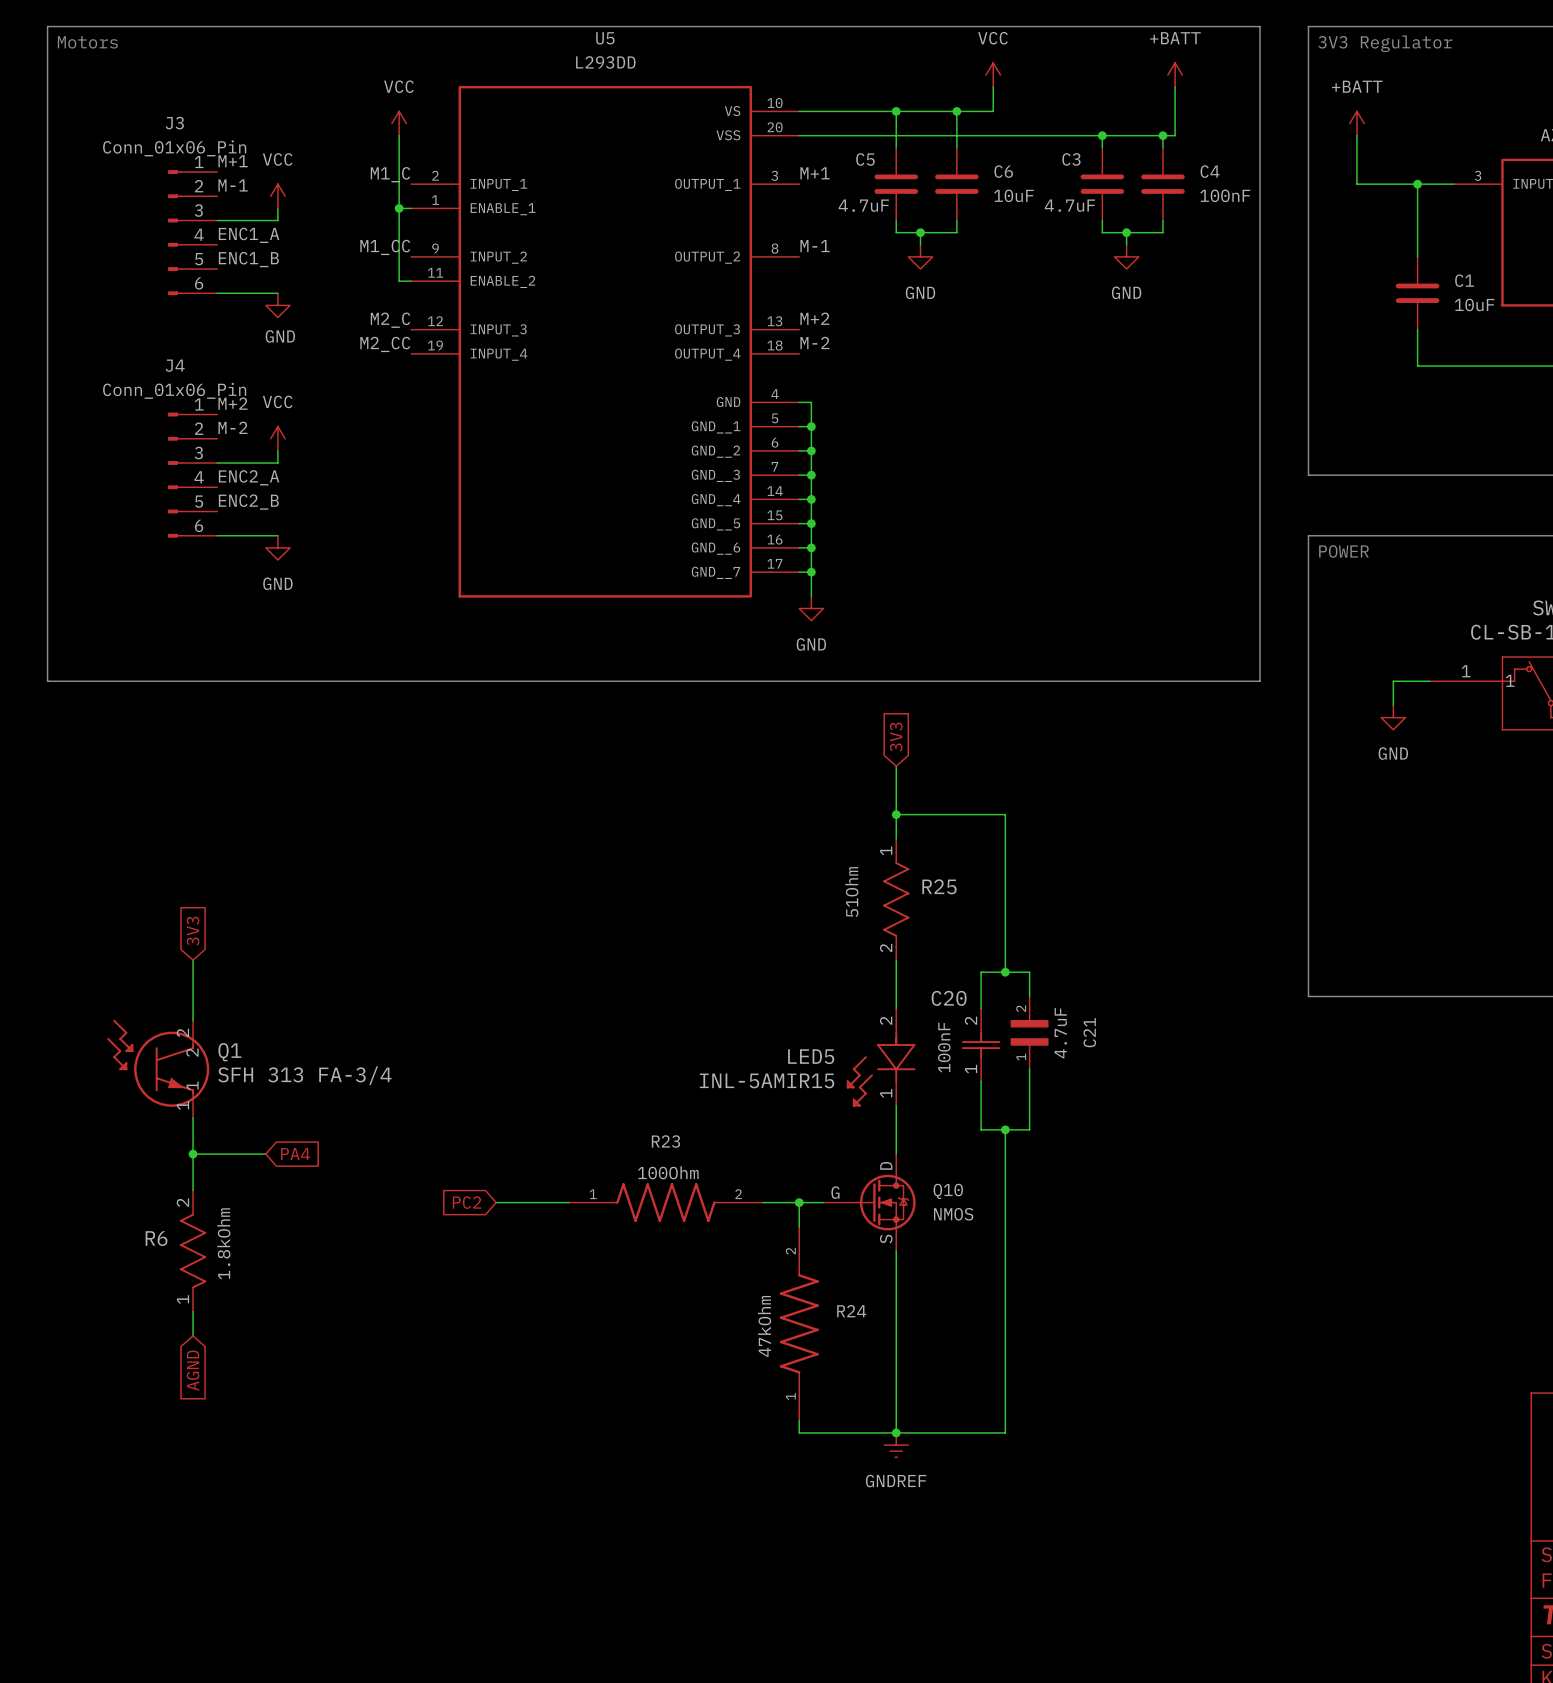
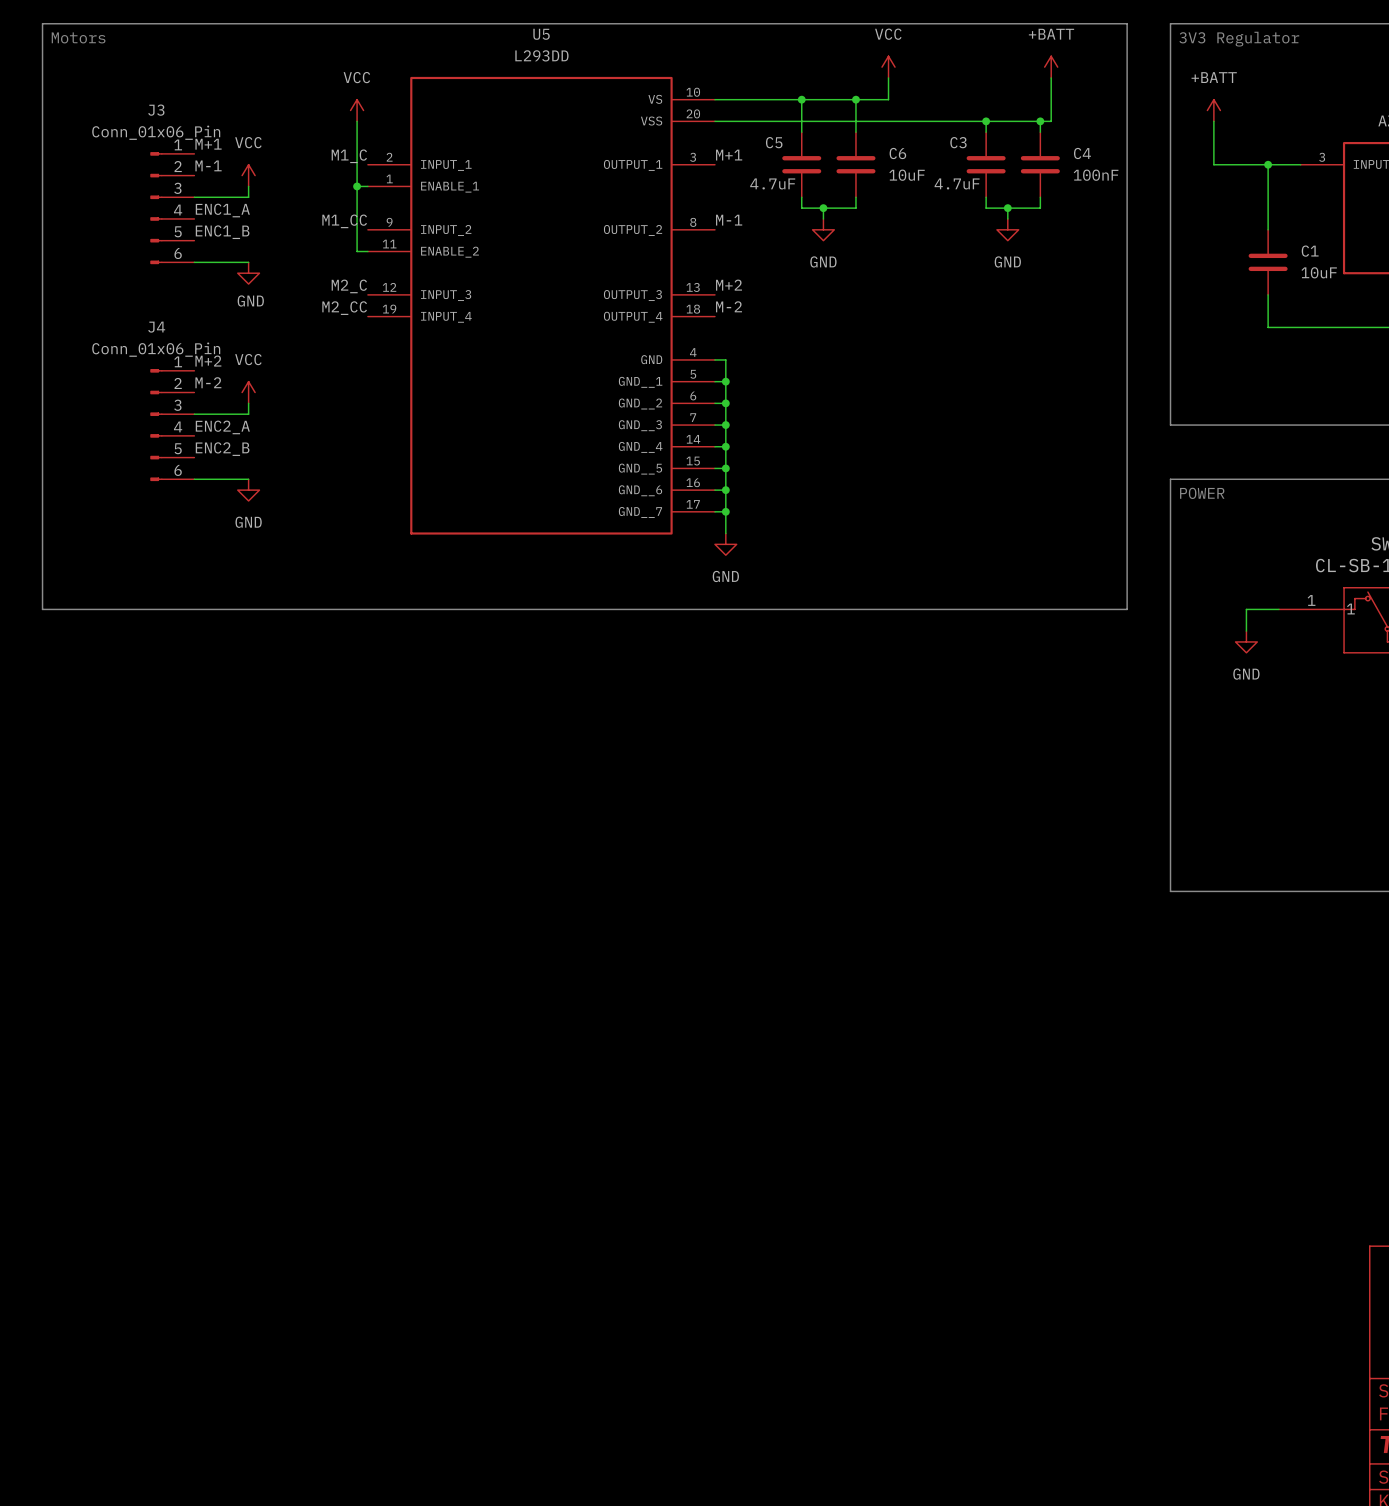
global label: 3V3 (896, 737) -> none
wire: (896, 766) (896, 838) -> none
wire: (896, 814) (1005, 814) (1005, 972) -> none
junction: (896, 814) -> none
R25: (896, 899) -> none
global label: 3V3 (193, 931) -> none
wire: (193, 960) (193, 1020) -> none
wire: (896, 960) (896, 1008) -> none
junction: (1005, 972) -> none
wire: (1029, 996) (1029, 972) (981, 972) (981, 1008) -> none
C21: (1029, 1032) -> none
C20: (981, 1044) -> none
LED5: INL-5AMIR15 (881, 1057) -> none
Q1: SFH 313 FA-3/4 (158, 1068) -> none
wire: (1029, 1069) (1029, 1129) (981, 1129) (981, 1081) -> none
wire: (896, 1105) (896, 1154) -> none
wire: (193, 1117) (193, 1190) -> none
wire: (1005, 1129) (1005, 1432) (799, 1432) (799, 1420) -> none
junction: (1005, 1129) -> none
wire: (193, 1154) (265, 1154) -> none
junction: (193, 1154) -> none
global label: PA4 (295, 1154) -> none
global label: PC2 (467, 1202) -> none
wire: (496, 1202) (568, 1202) -> none
R23: (665, 1202) -> none
wire: (762, 1202) (823, 1202) -> none
wire: (799, 1202) (799, 1226) -> none
junction: (799, 1202) -> none
Q10: NMOS (869, 1202) -> none
R6: (193, 1251) -> none
wire: (896, 1251) (896, 1432) -> none
wire: (193, 1311) (193, 1335) -> none
R24: (799, 1323) -> none
global label: AGND (193, 1370) -> none
junction: (896, 1432) -> none
power symbol: GNDREF (896, 1445) -> none

